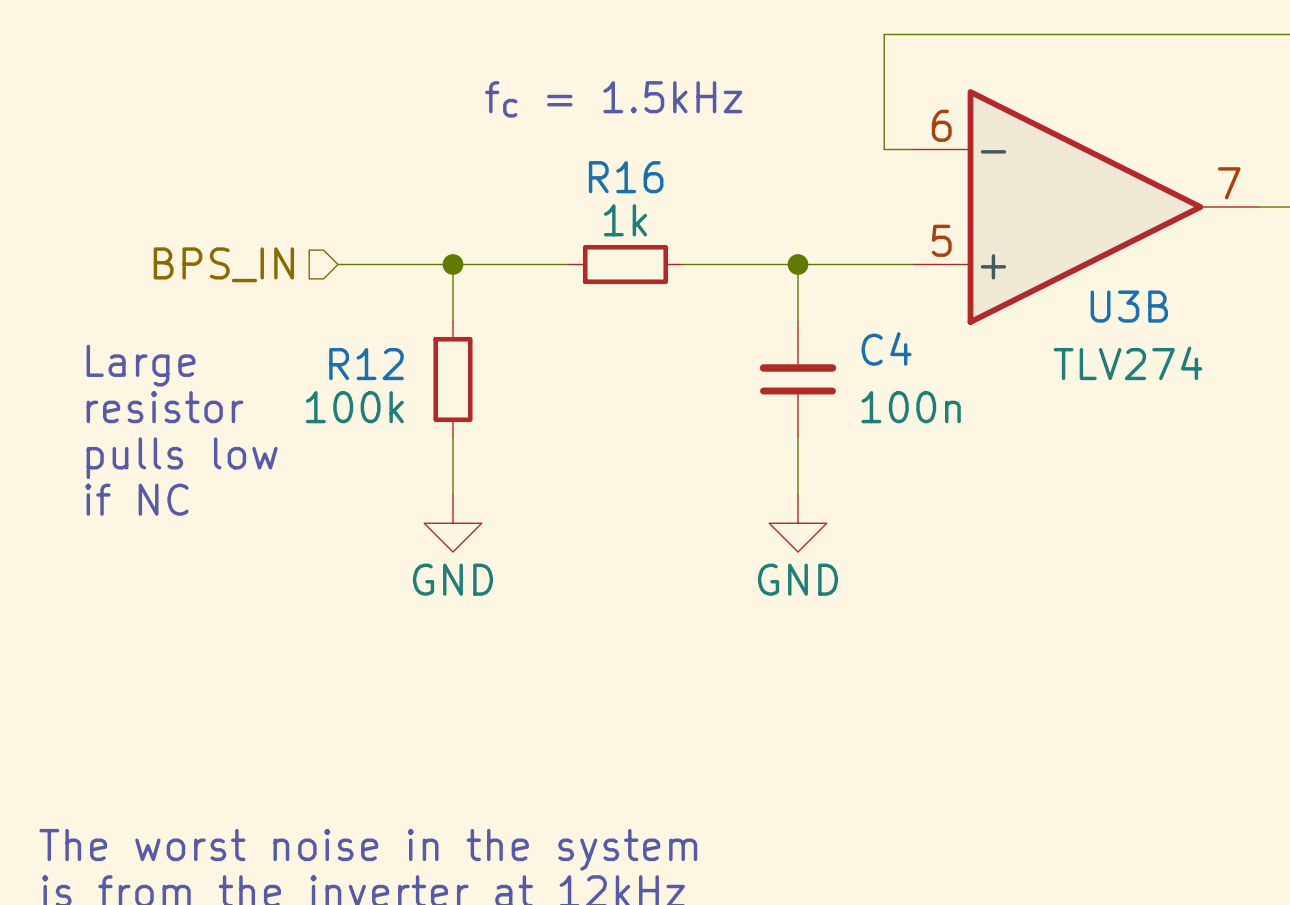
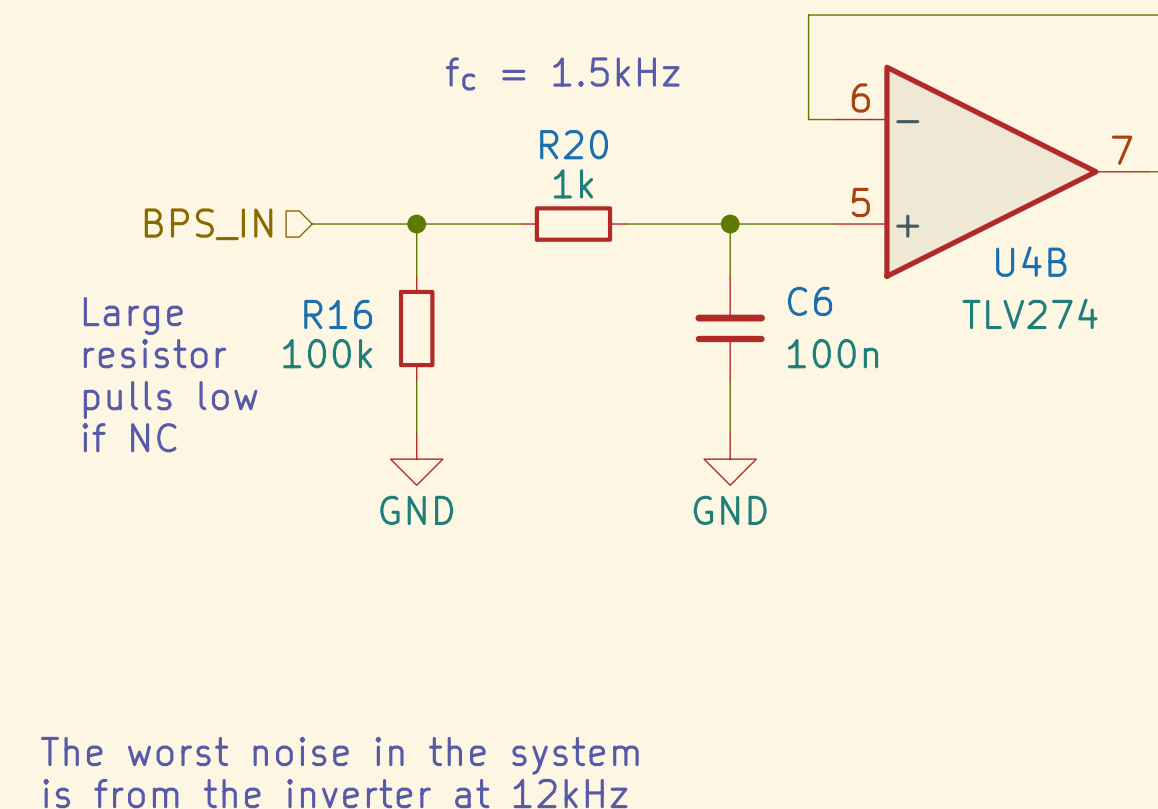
R16 name: R16 (626, 177) -> R20 (574, 144)
U3B name: U3B (1129, 306) -> U4B (1031, 261)
C4 name: C4 (886, 349) -> C6 (810, 301)
R12 name: R12 (366, 364) -> R16 (338, 314)

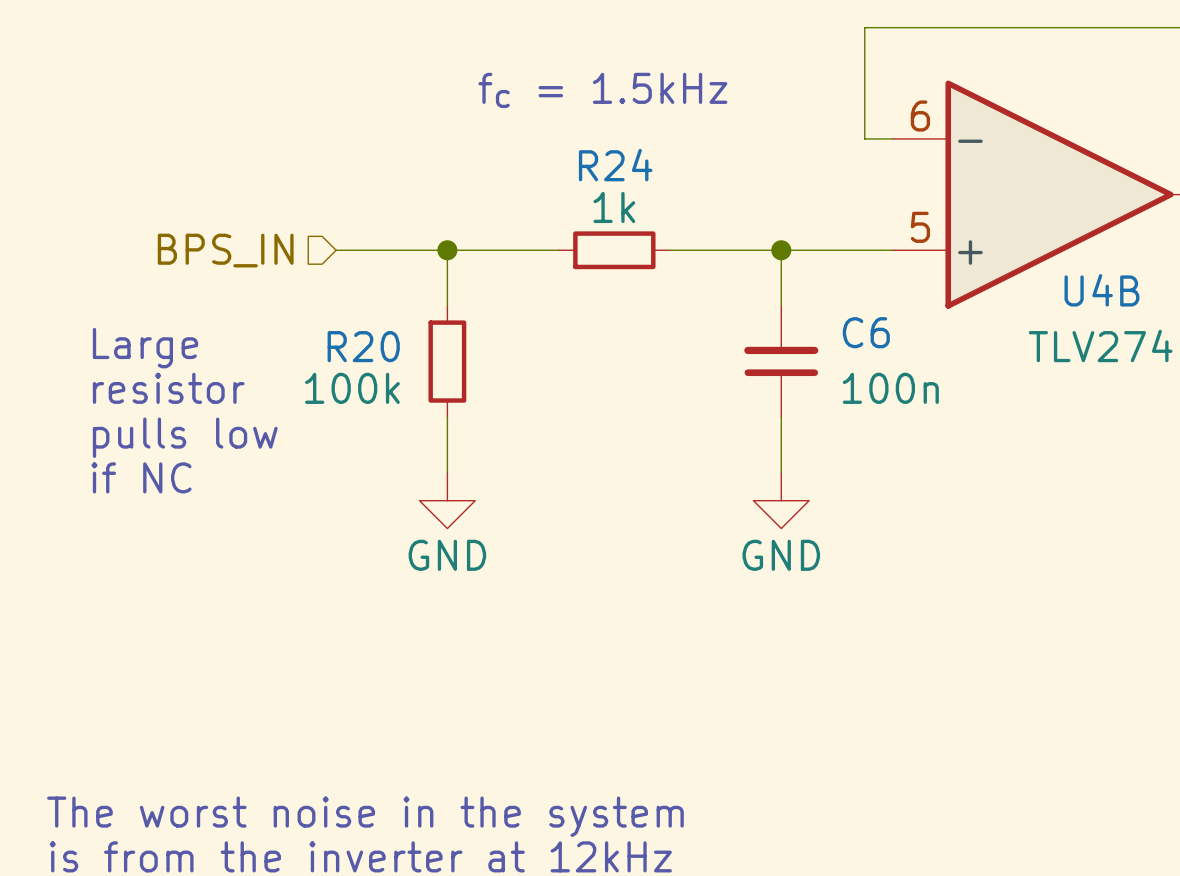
R20 name: R20 (574, 144) -> R24 (615, 165)
R16 name: R16 (338, 314) -> R20 (363, 346)

